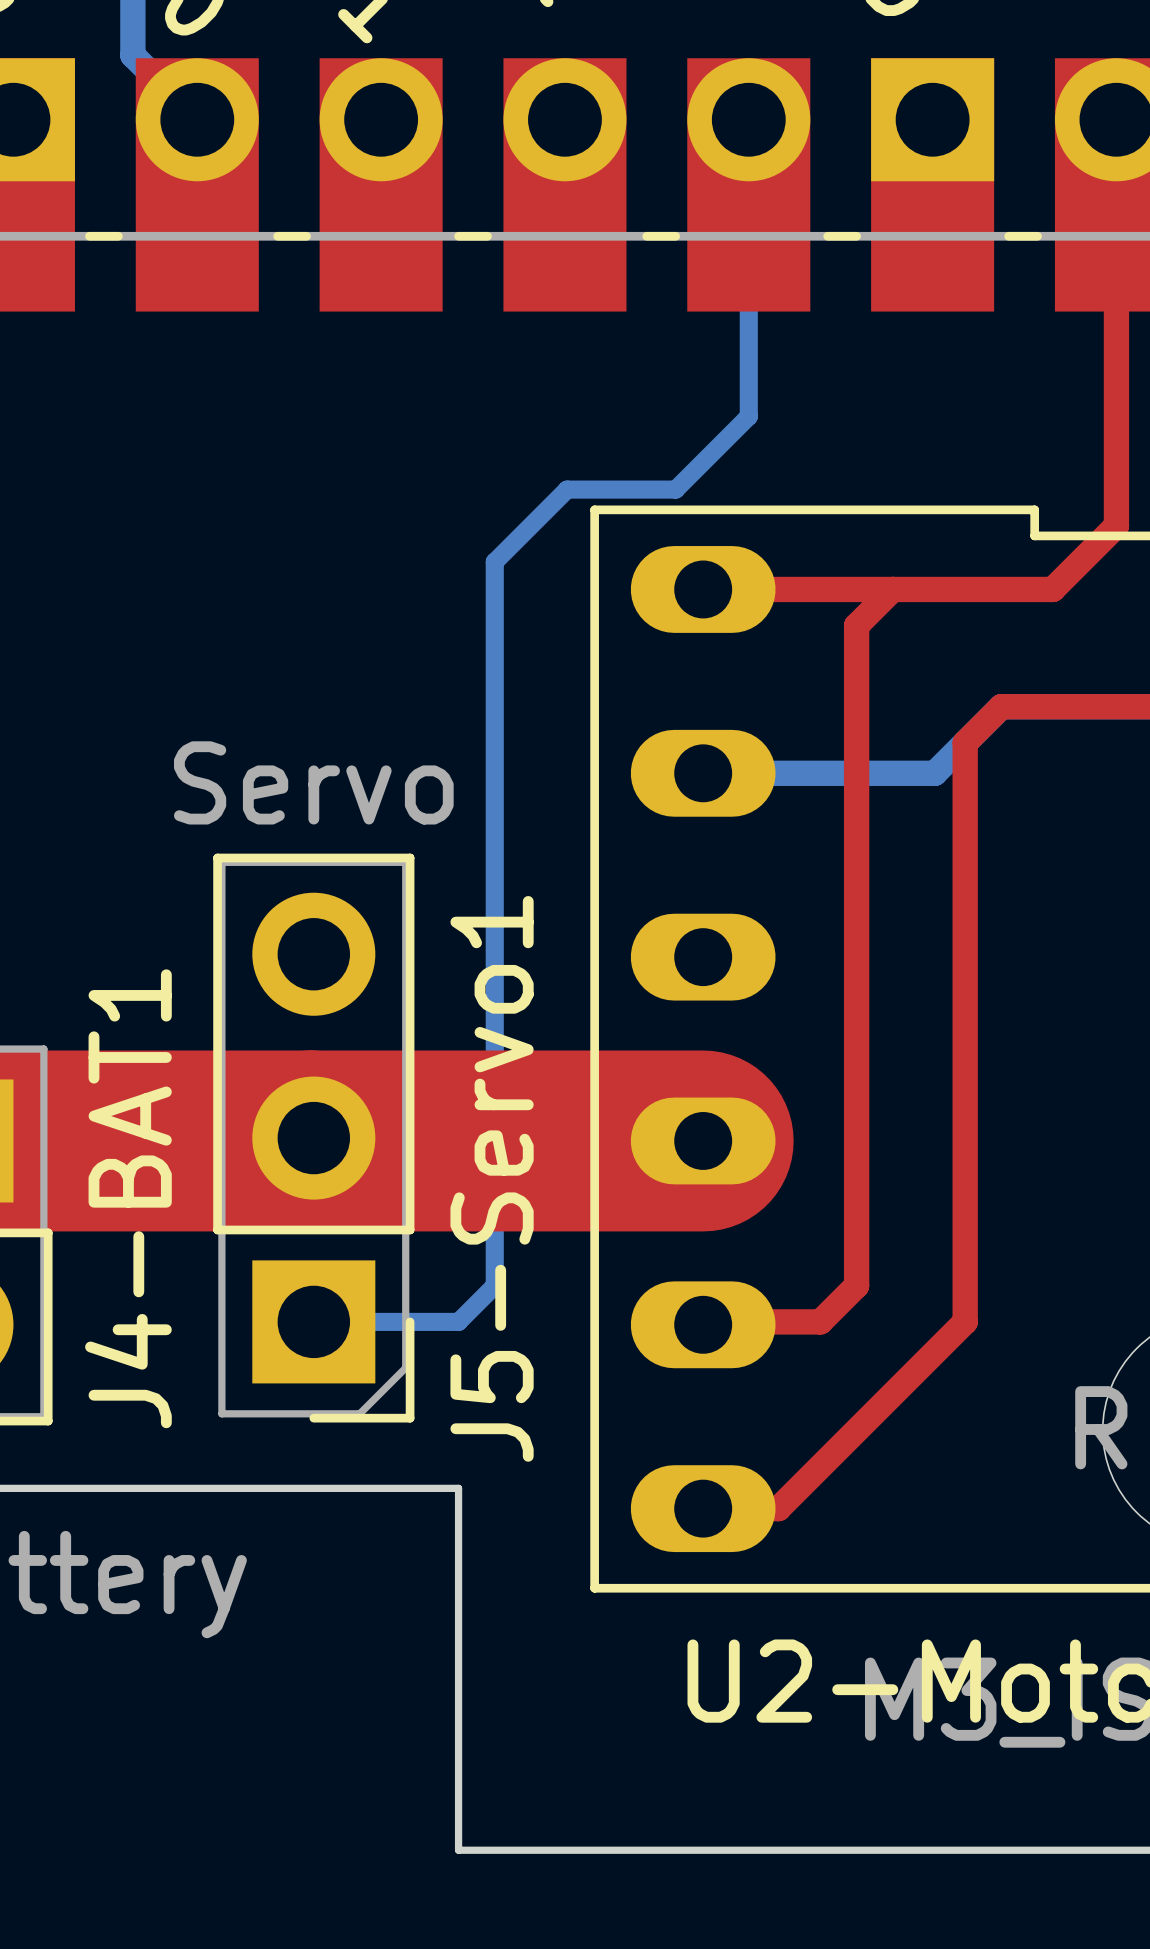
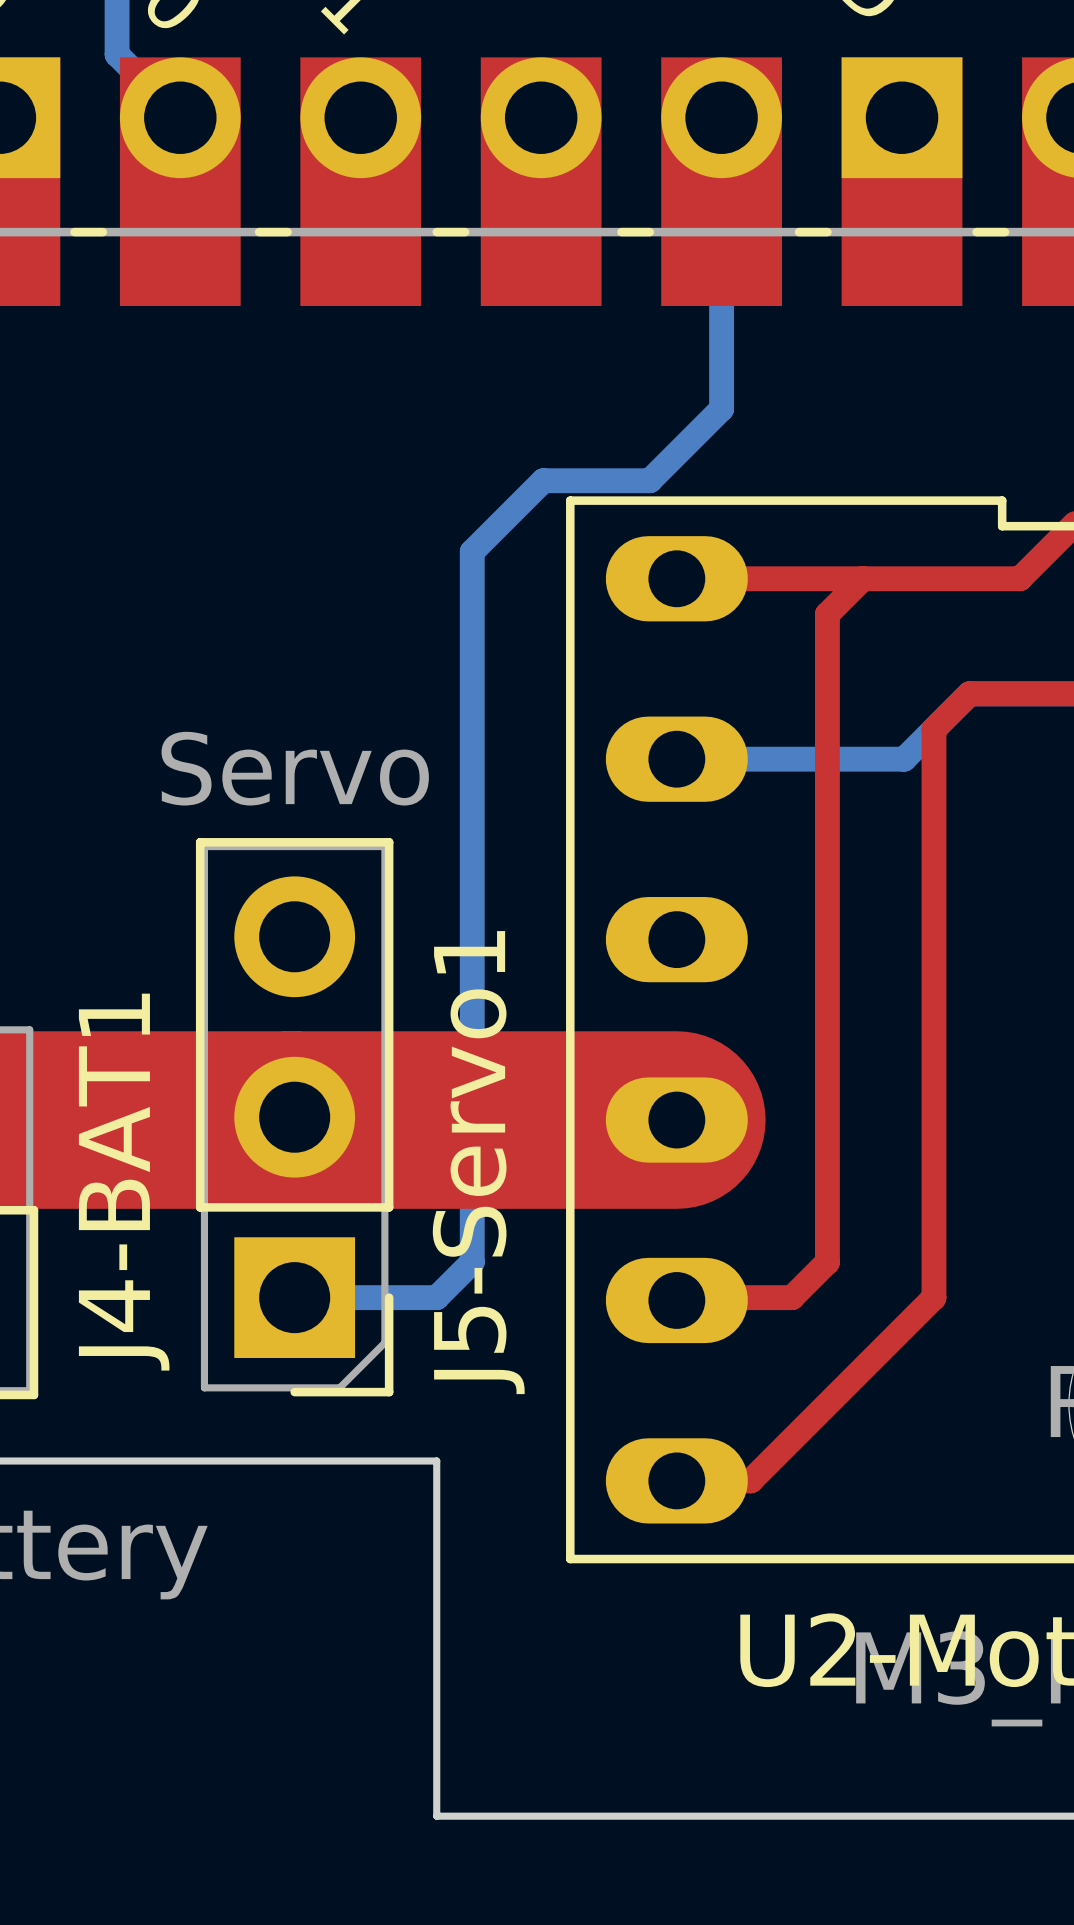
bottom track width: thin (748, 119) (748, 416) (675, 489) (567, 489) (494, 561) (494, 1285) (458, 1321) (313, 1321) -> thick (721, 117) (721, 408) (649, 480) (543, 480) (472, 551) (472, 1262) (436, 1297) (294, 1297)

